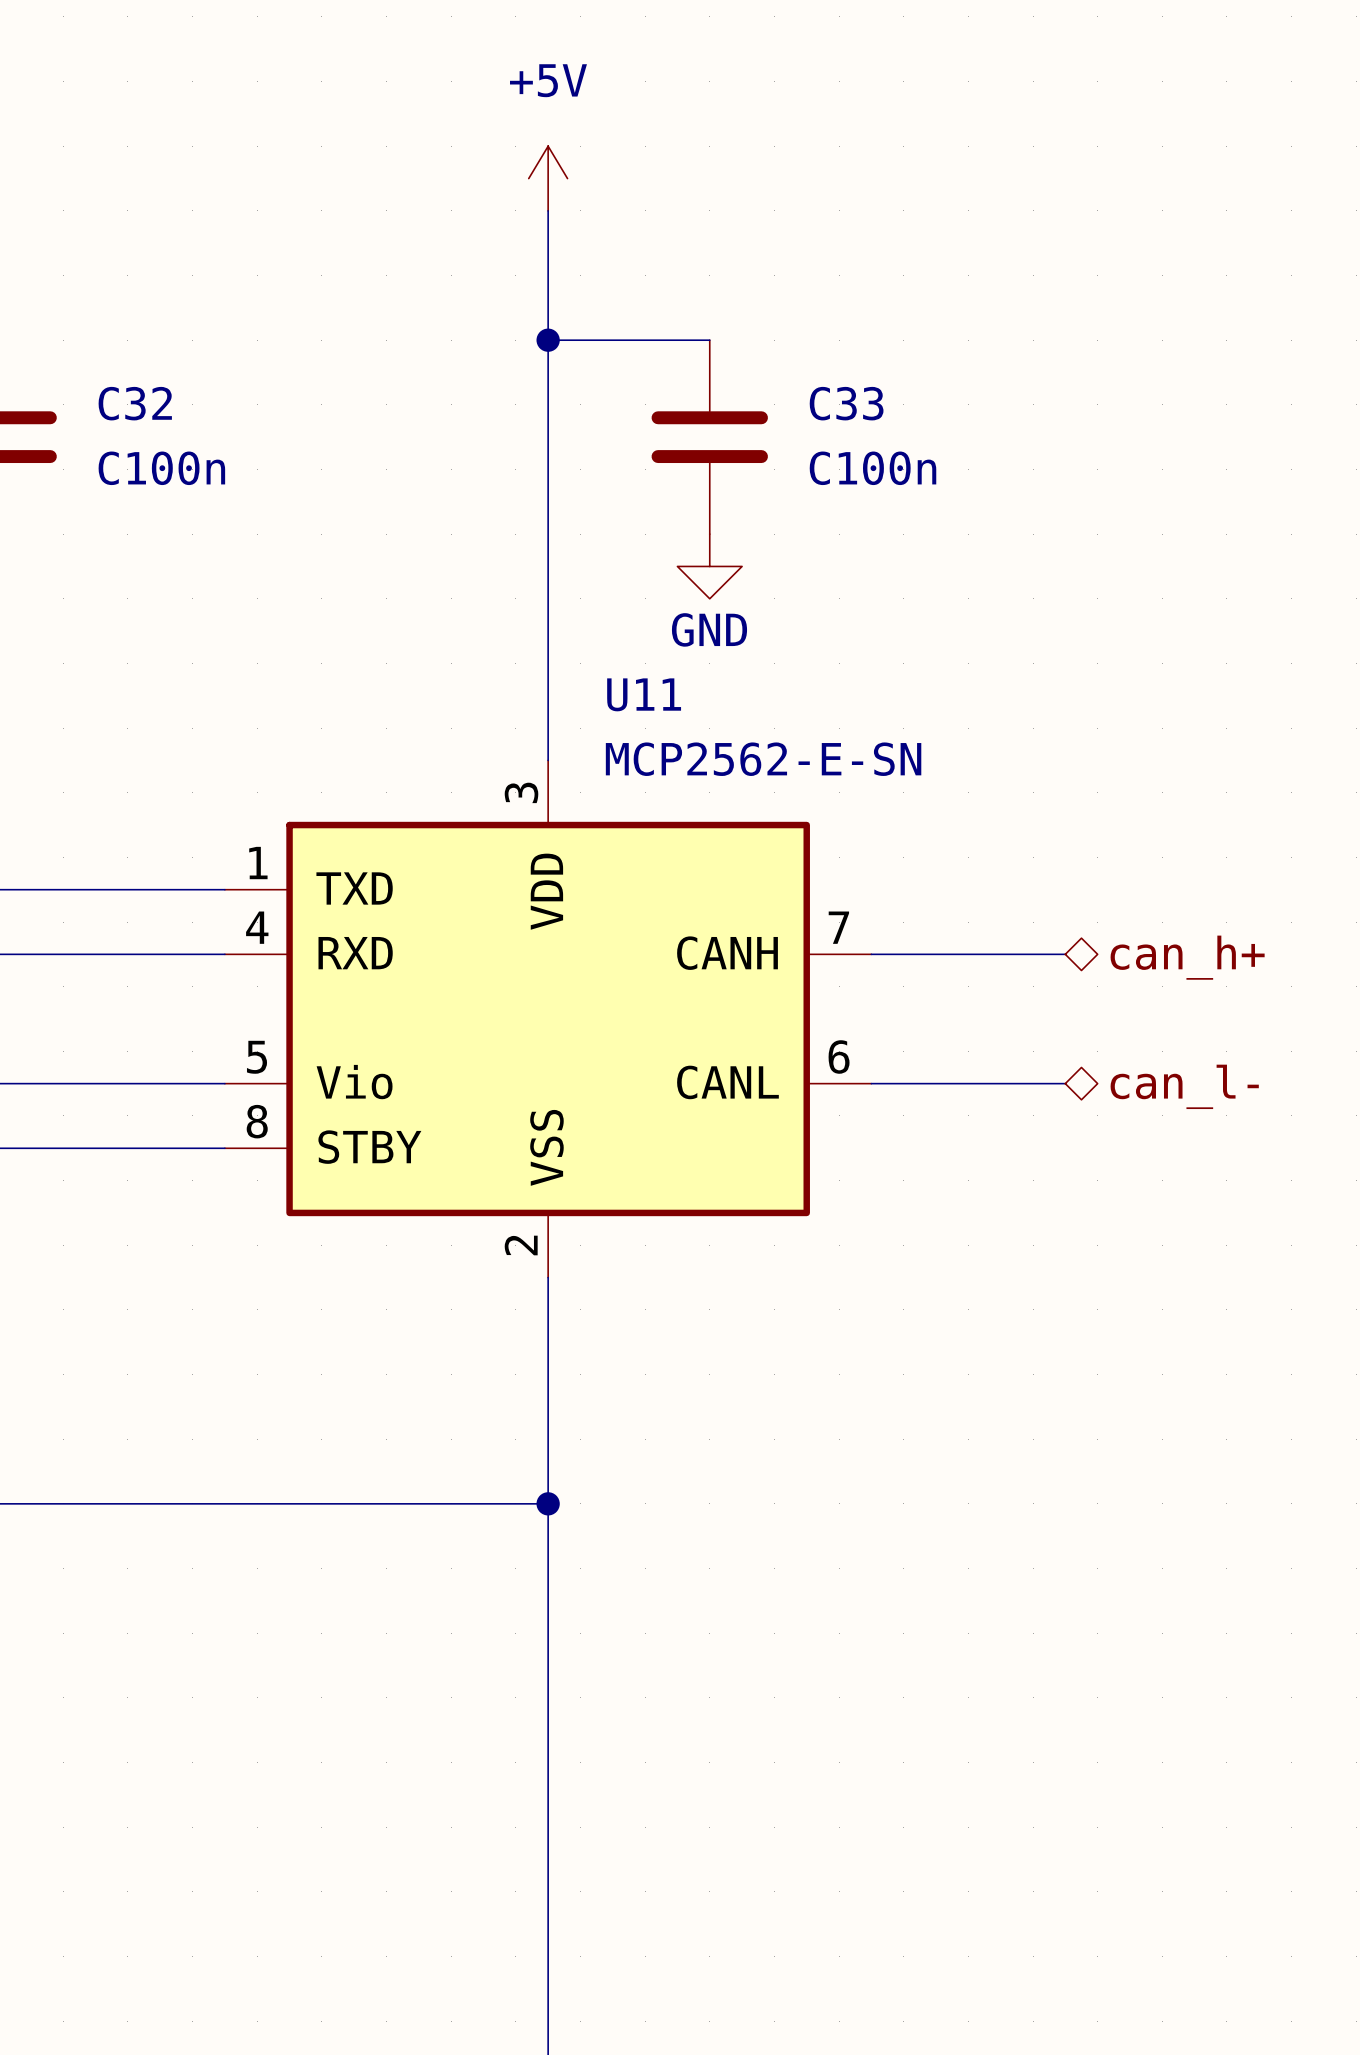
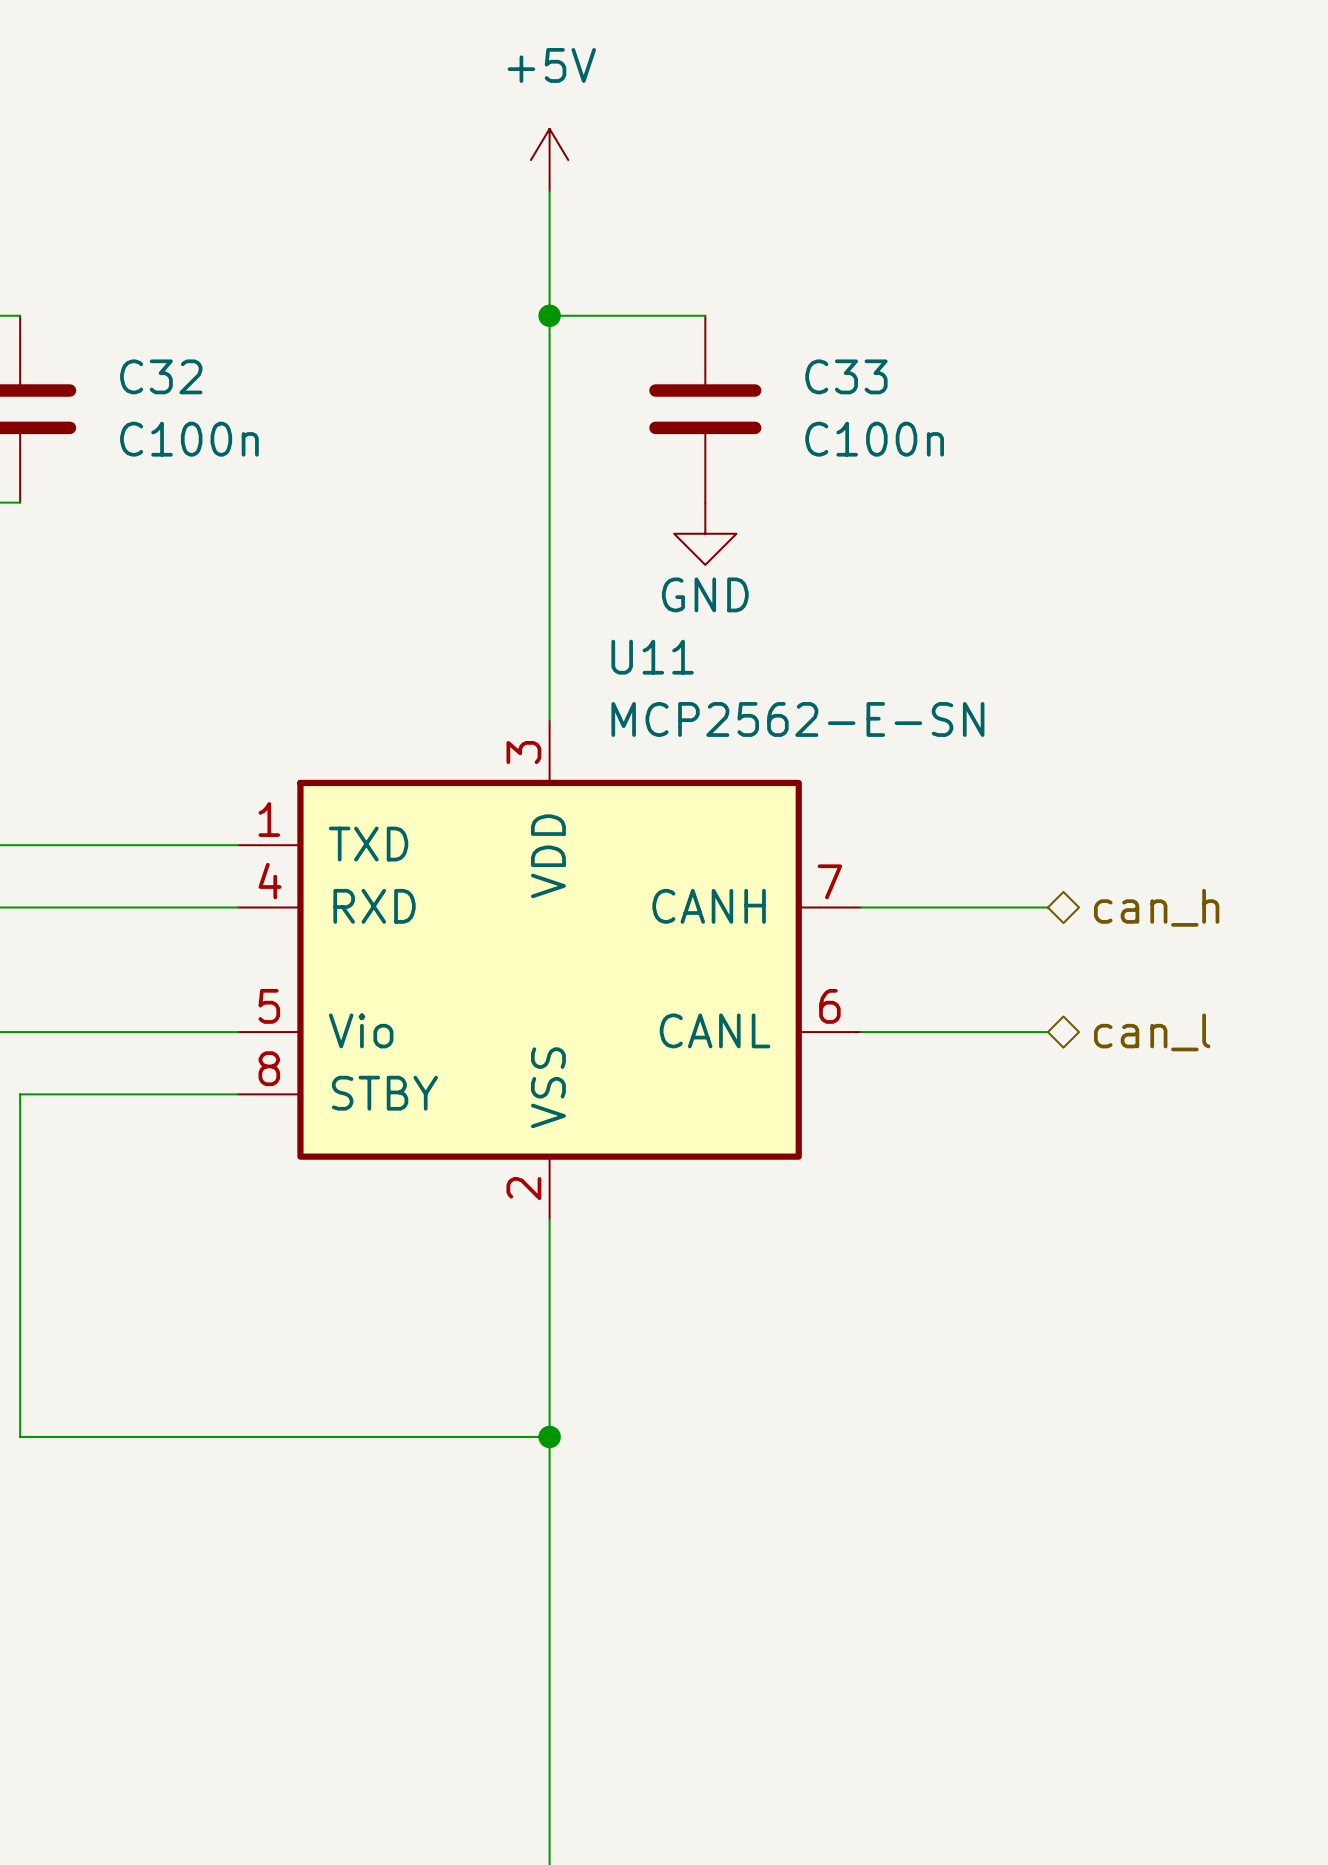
hierarchical label: can_h+ (1187, 957) -> can_h (1156, 907)
hierarchical label: can_l- (1184, 1086) -> can_l (1152, 1032)

